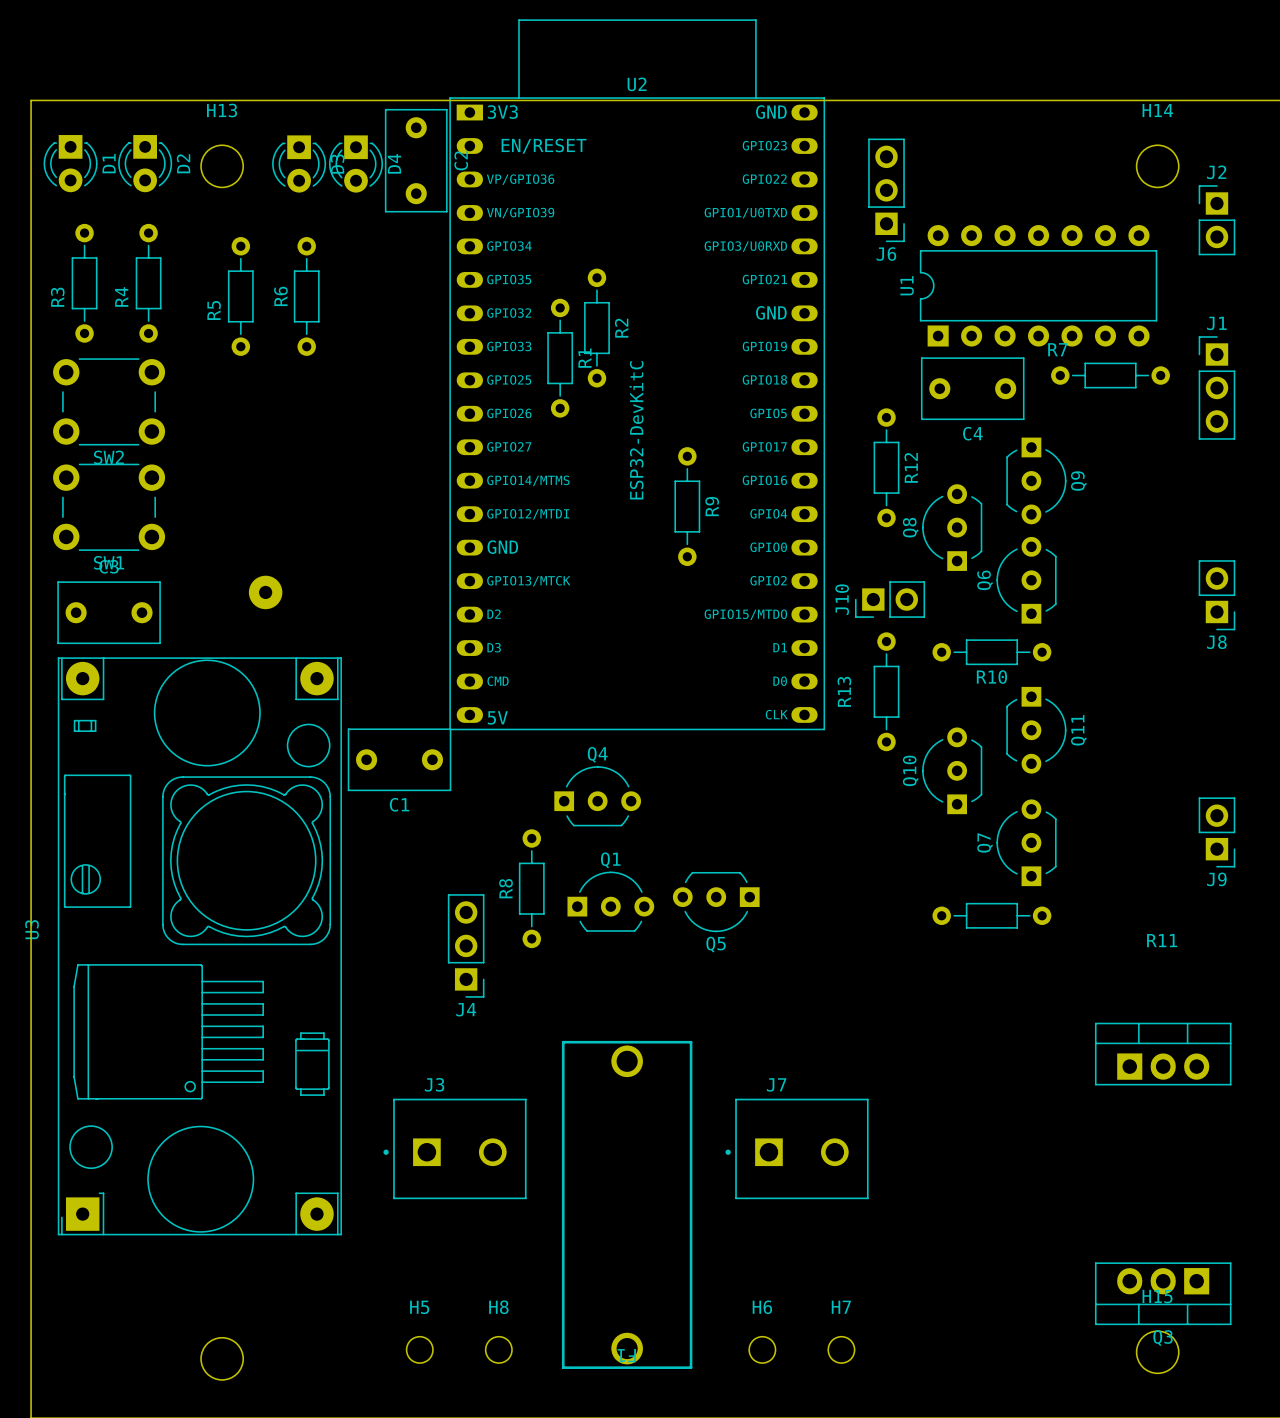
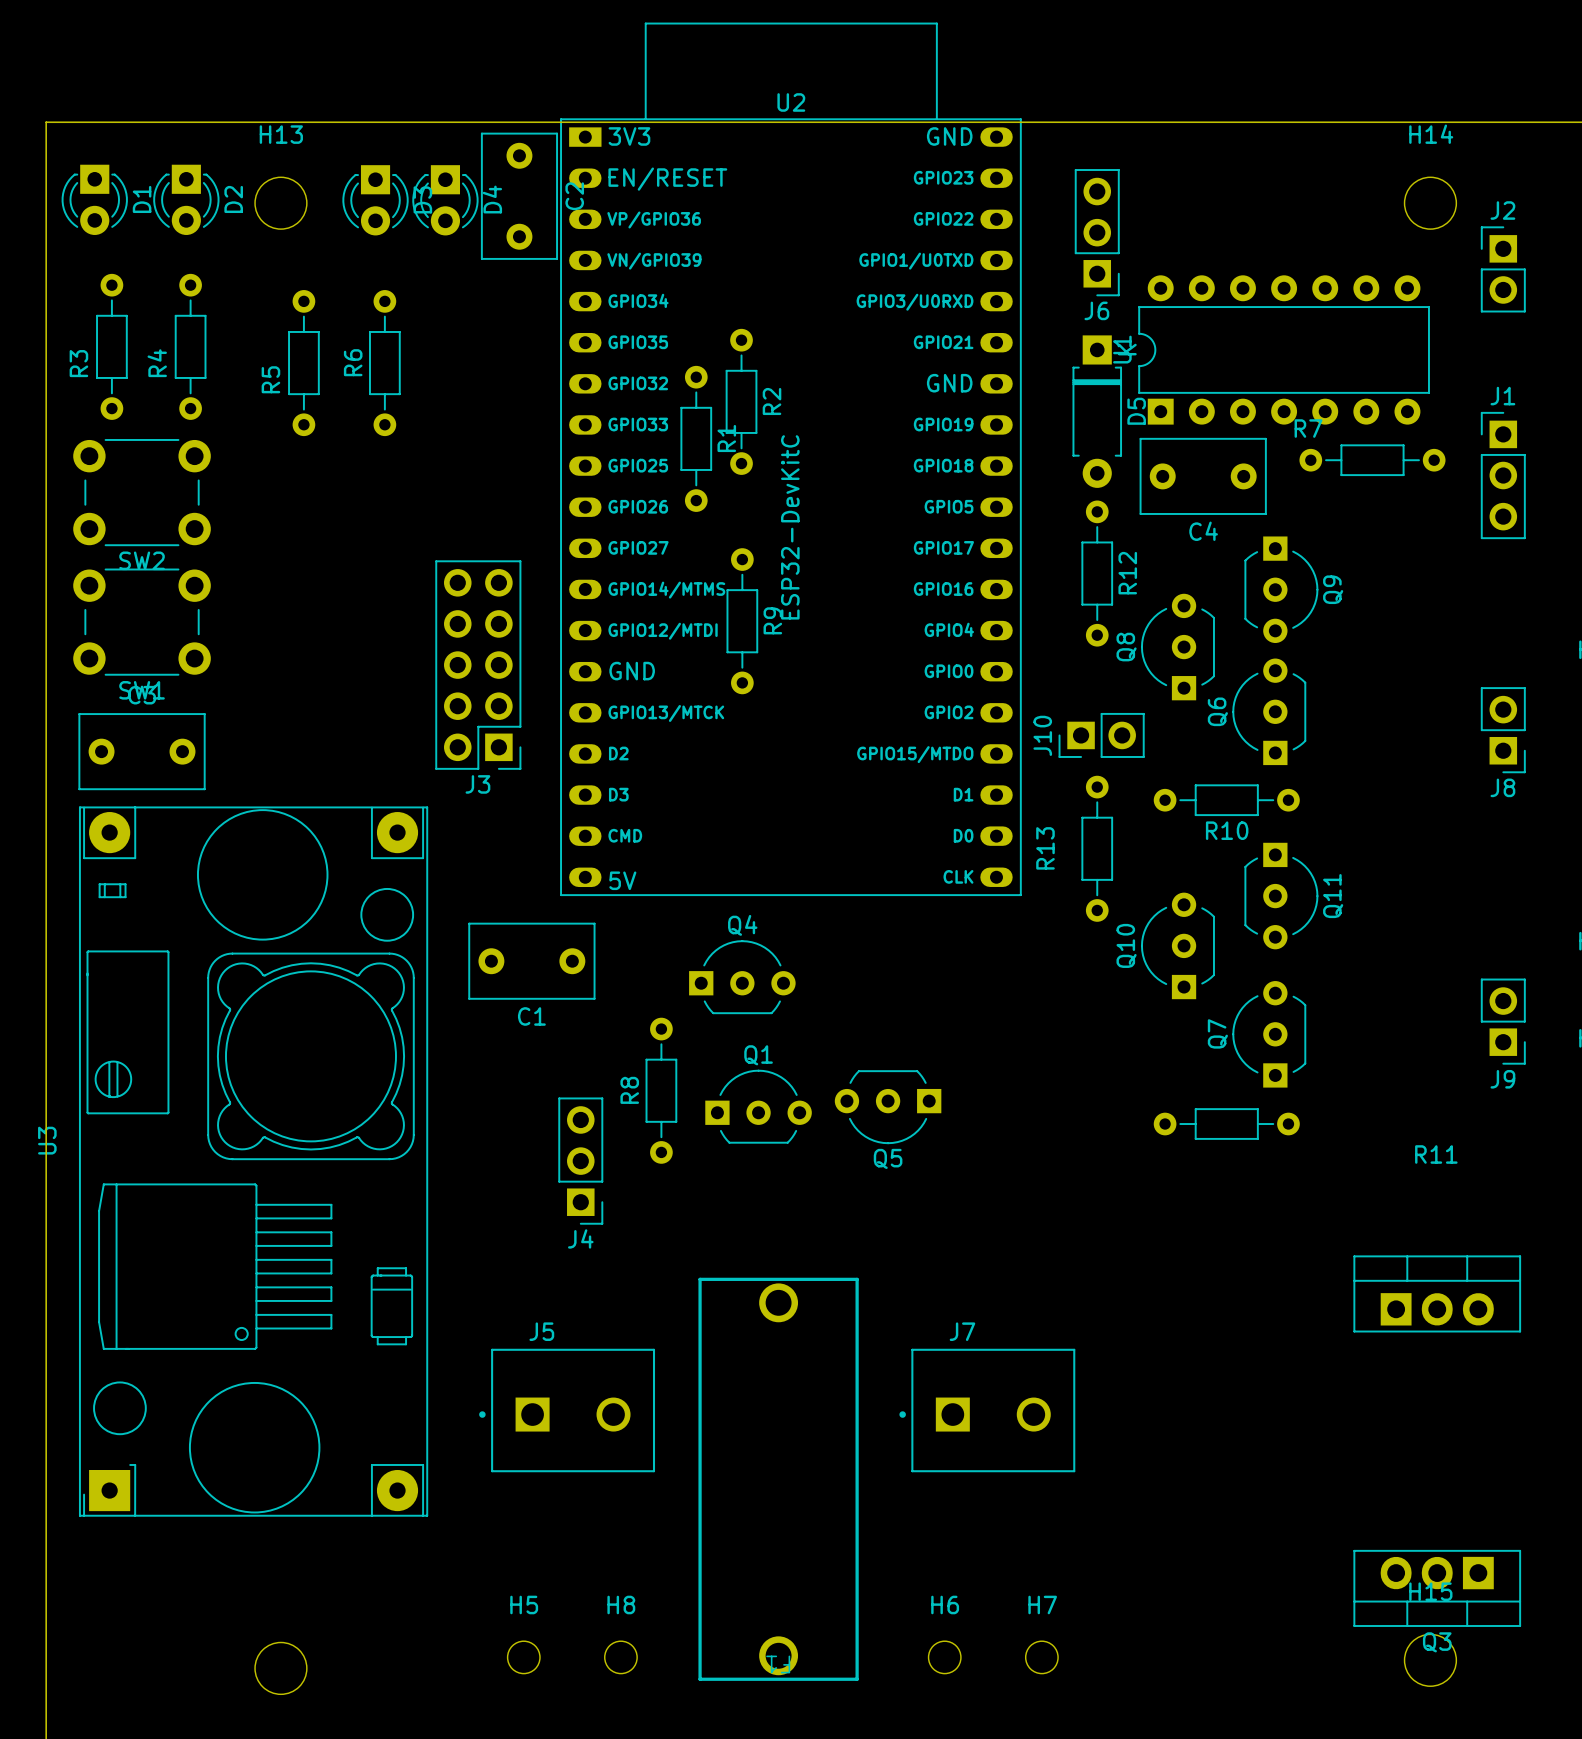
D5: none -> (1097, 411)
R9 position: (687, 506) -> (742, 621)
J3: none -> (478, 665)
part: (265, 592) -> none
C1 position: (399, 759) -> (531, 961)
J3 name: J3 (434, 1084) -> J5 (541, 1331)

